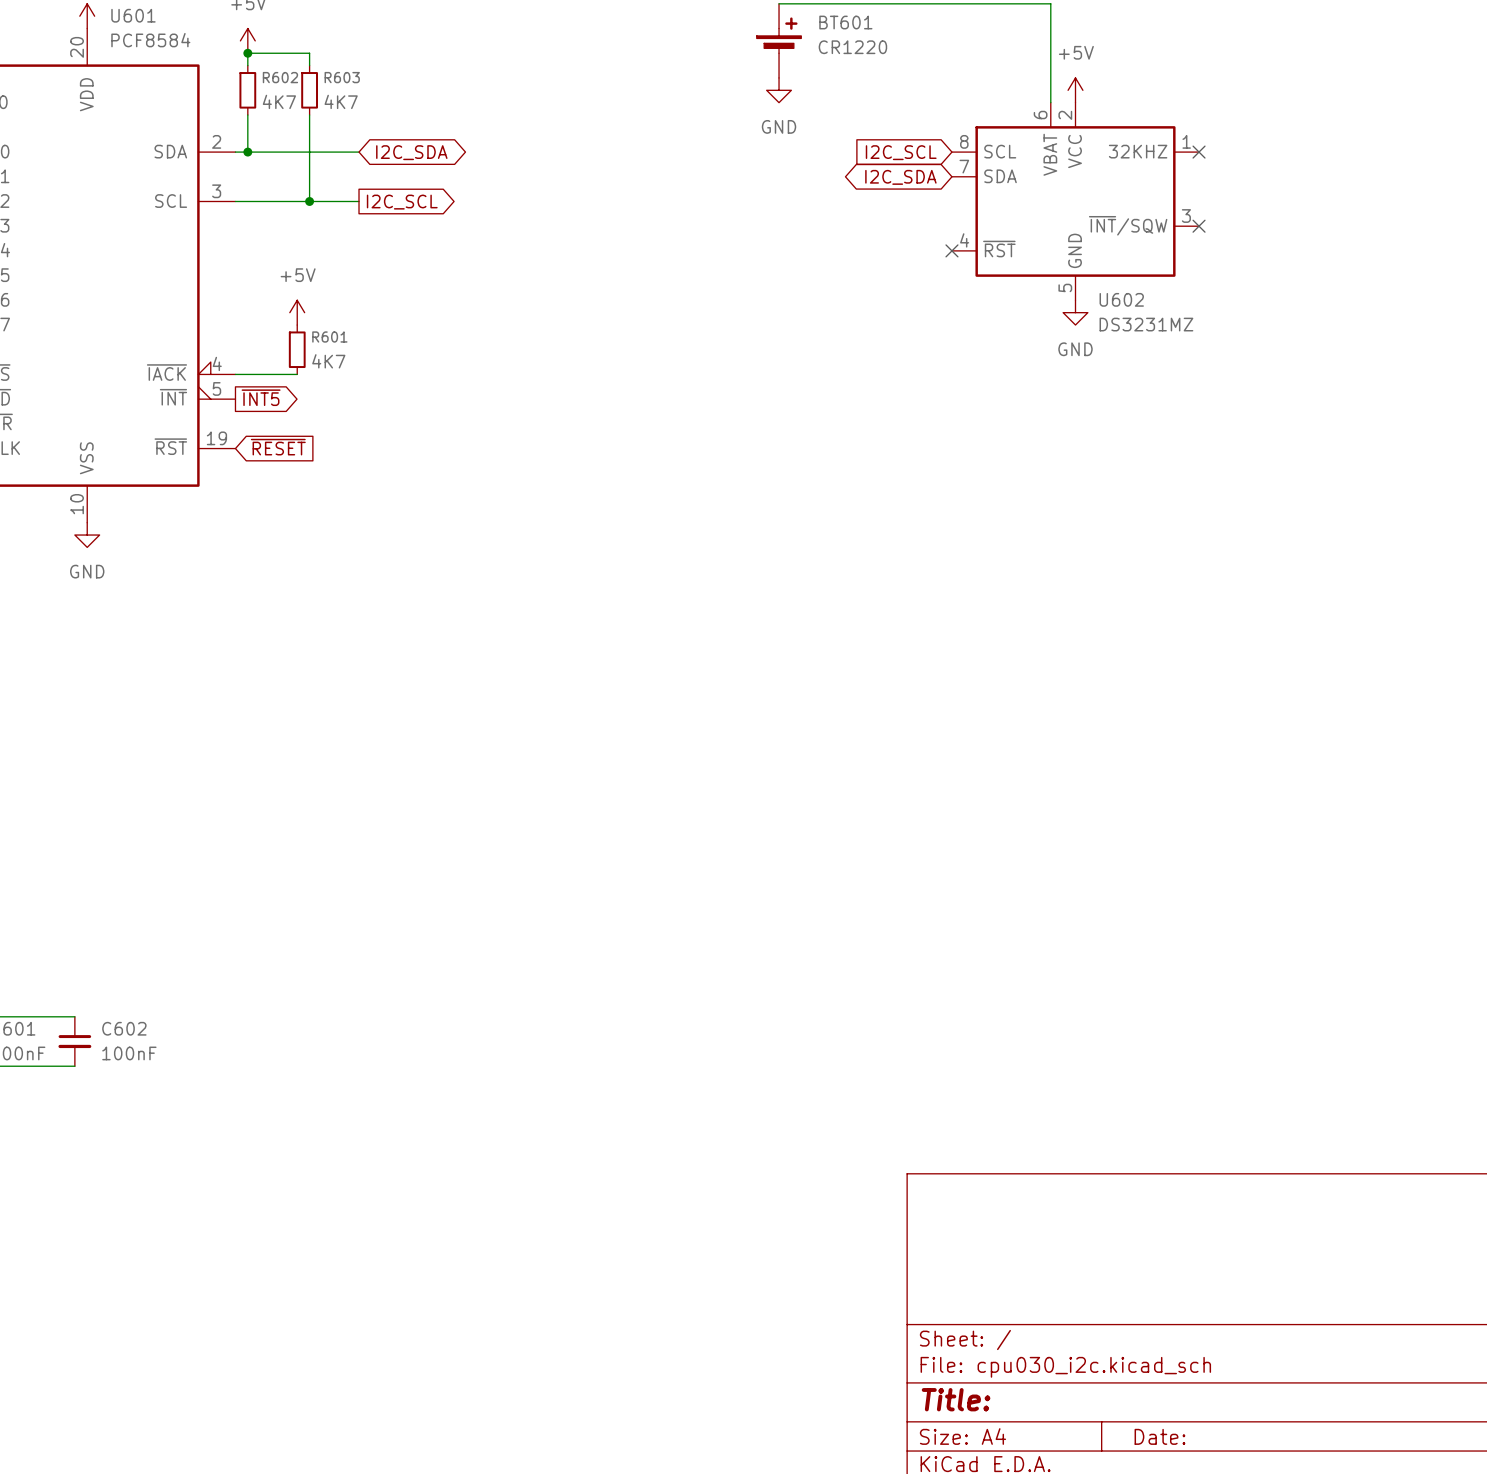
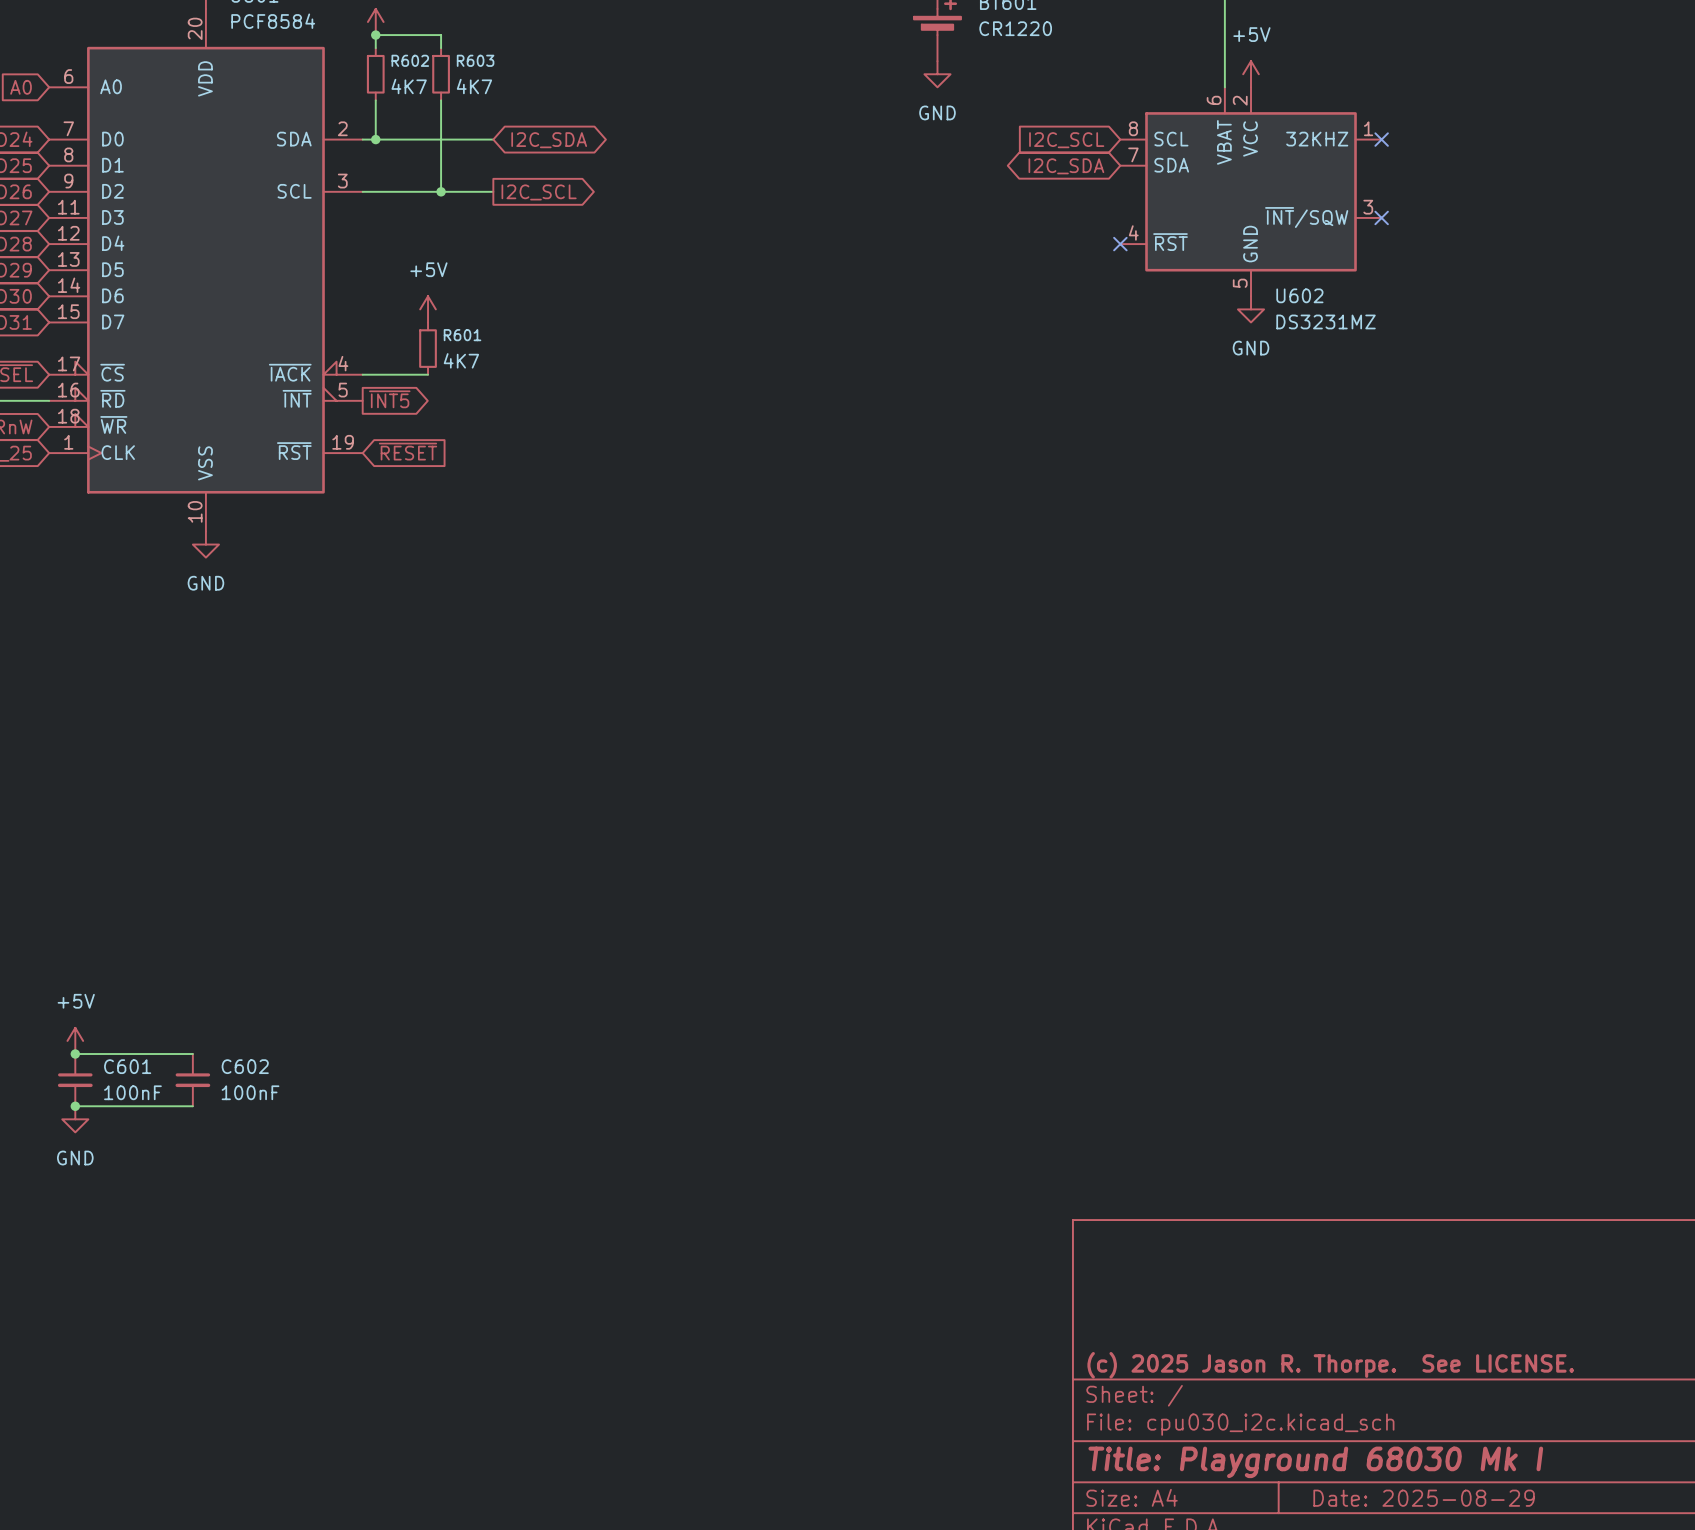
title block: none -> (c) 2025 Jason R. Thorpe. See LICENSE. (1330, 1365)
title block: Title: (956, 1399) -> Title: Playground 68030 Mk I (1315, 1462)
title block: Date: (1159, 1436) -> Date: 2025-08-29 (1424, 1498)

